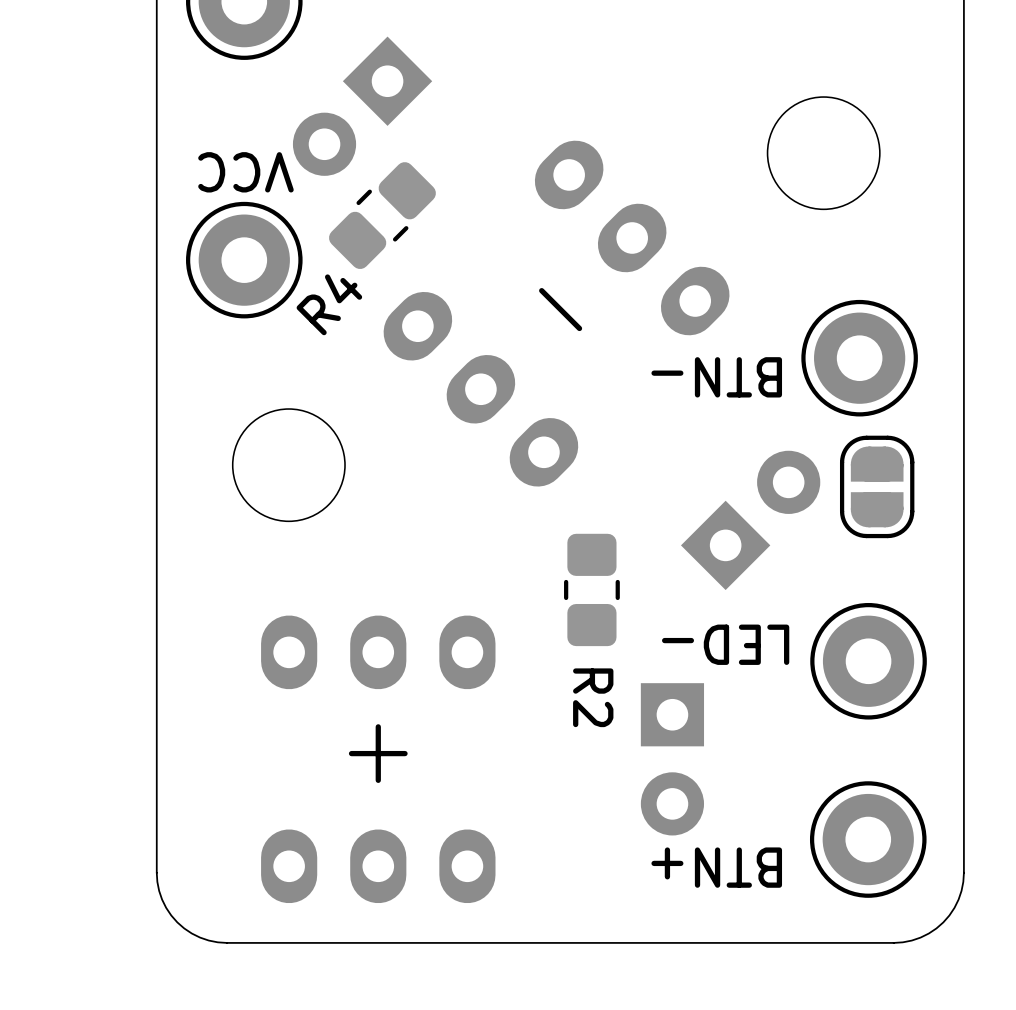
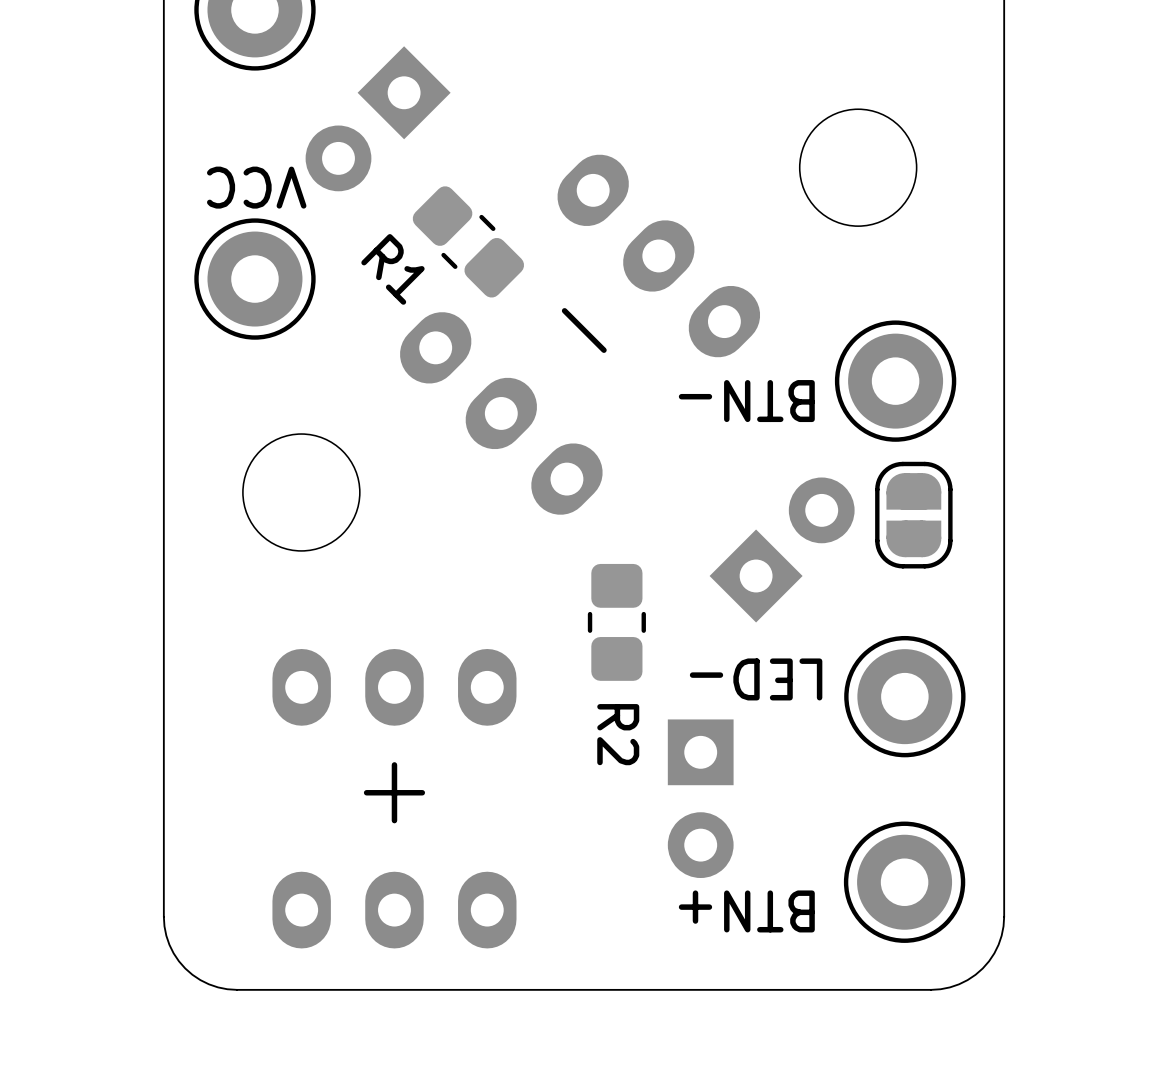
R4: (382, 215) -> none
R1: none -> (468, 241)

